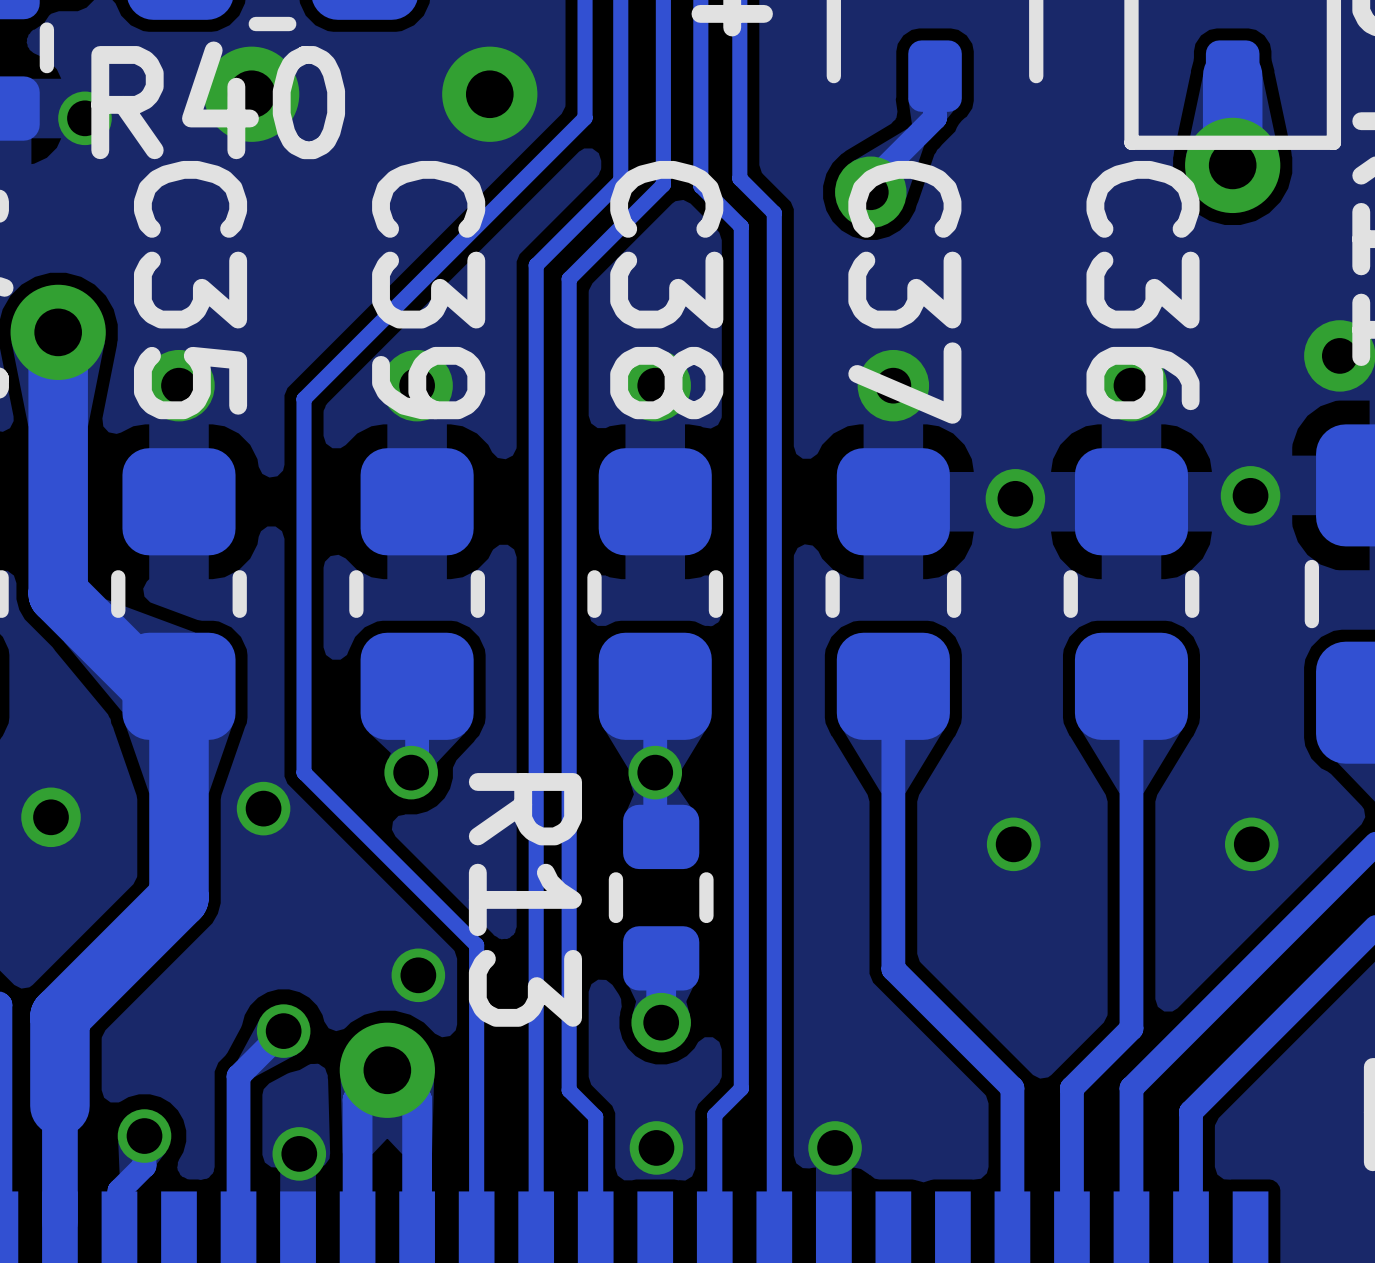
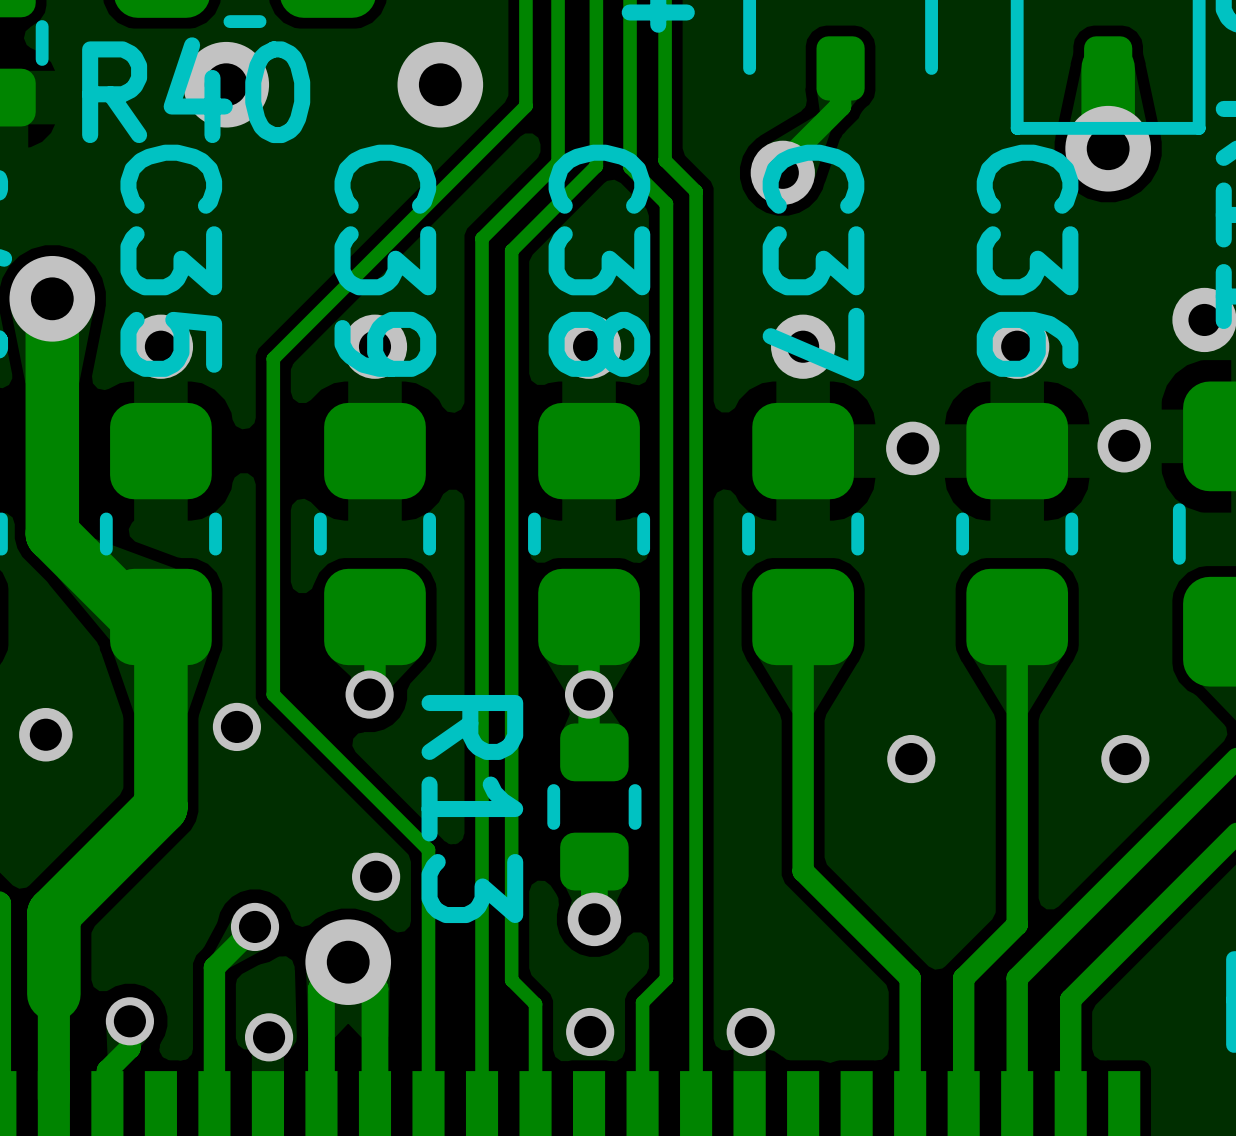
via: (84, 118) -> none

